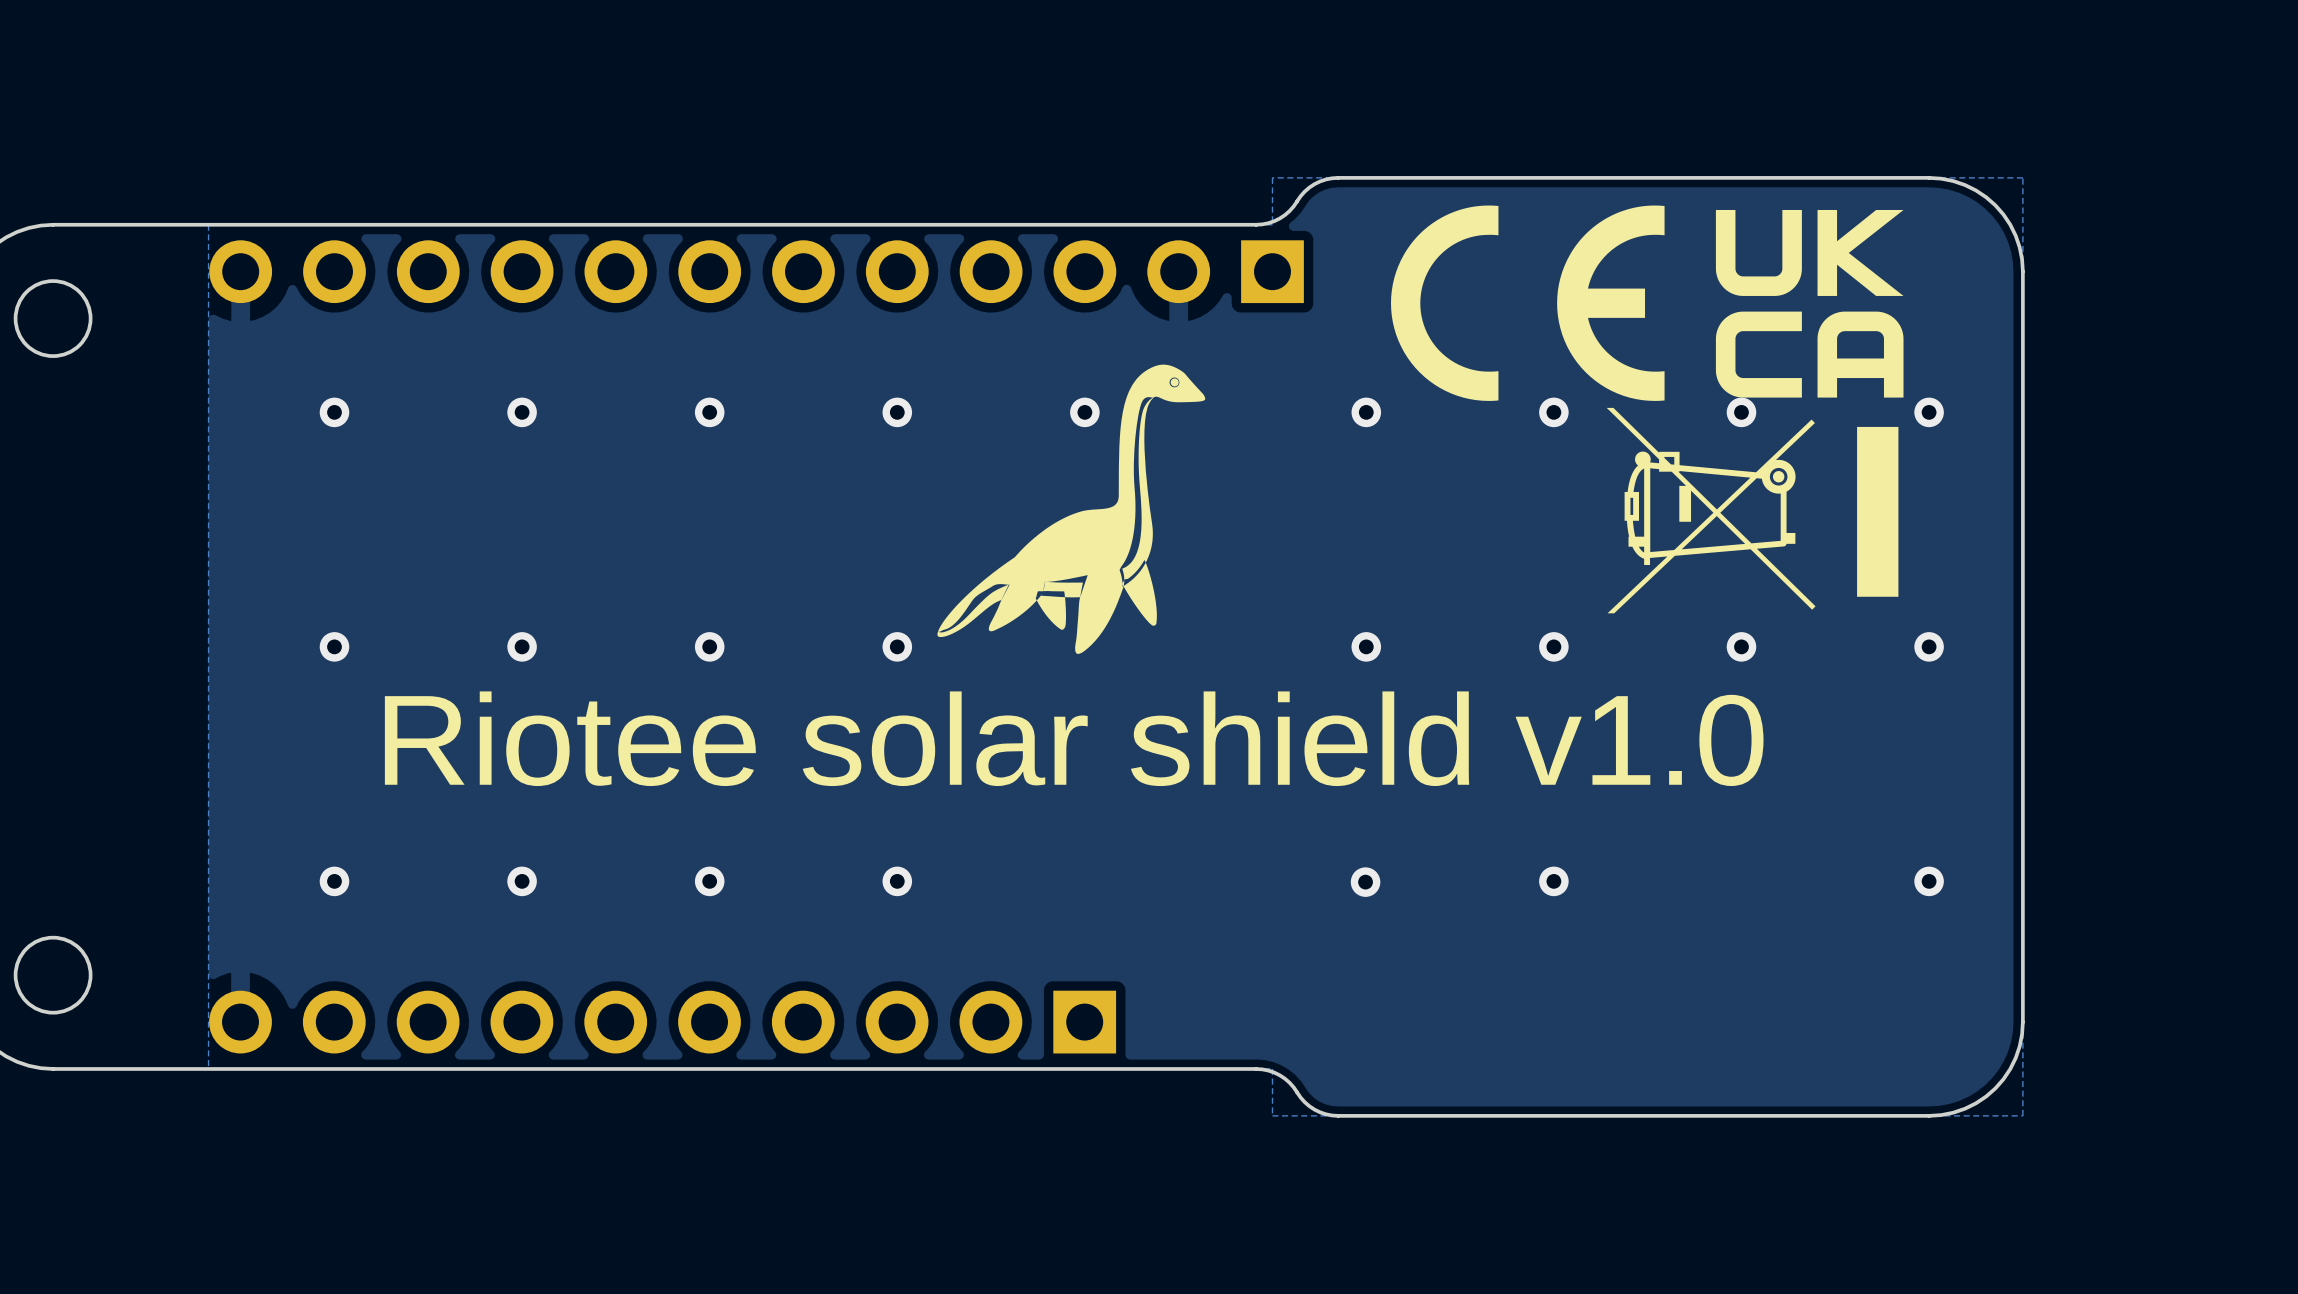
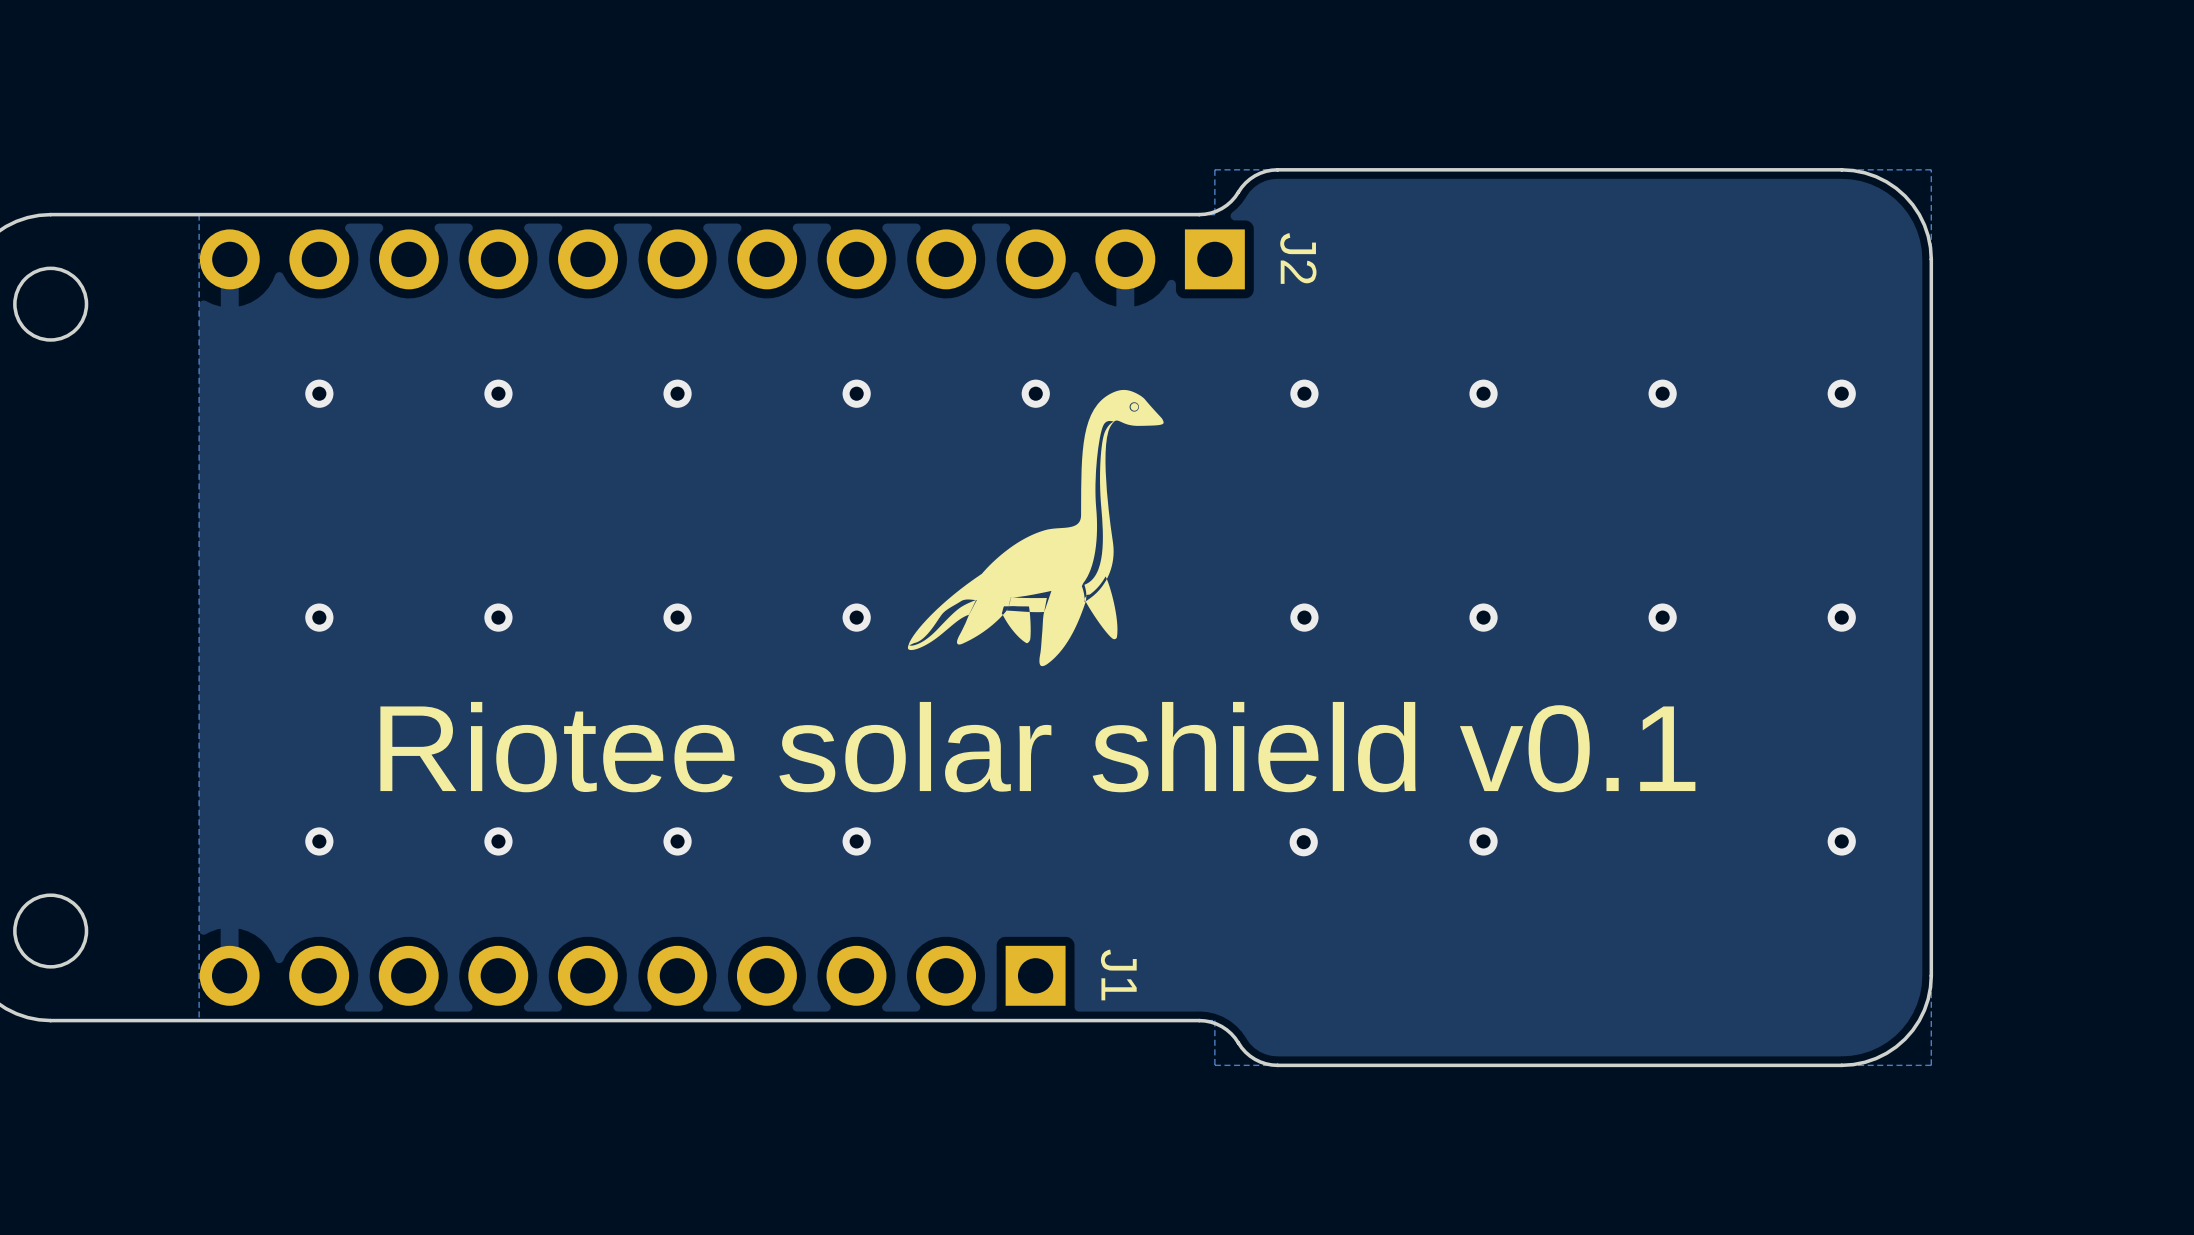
drawing: [1390, 205, 1499, 401] -> none
drawing: [1557, 205, 1904, 614] -> none
J2 name: none -> J2 (1298, 258)
drawing: [937, 364, 1206, 654] -> none
drawing position: (1174, 382) -> (1134, 406)
drawing: none -> [907, 389, 1164, 667]
drawing position: (1140, 594) -> (1101, 609)
text: Riotee solar shield v1.0 (1074, 738) -> Riotee solar shield v0.1 (1037, 747)
J1 name: none -> J1 (1118, 974)

